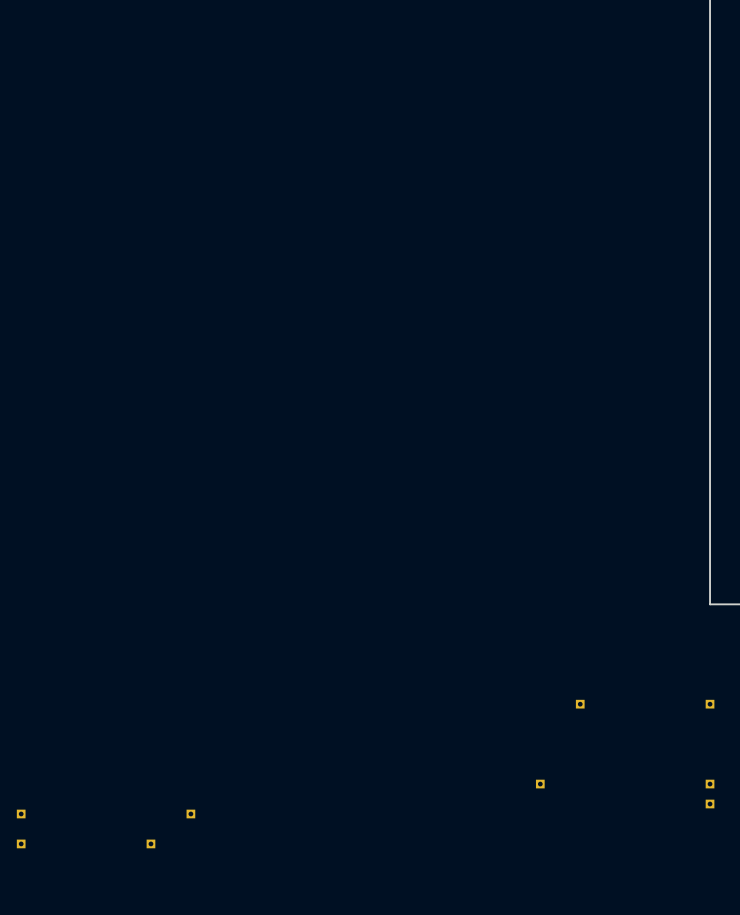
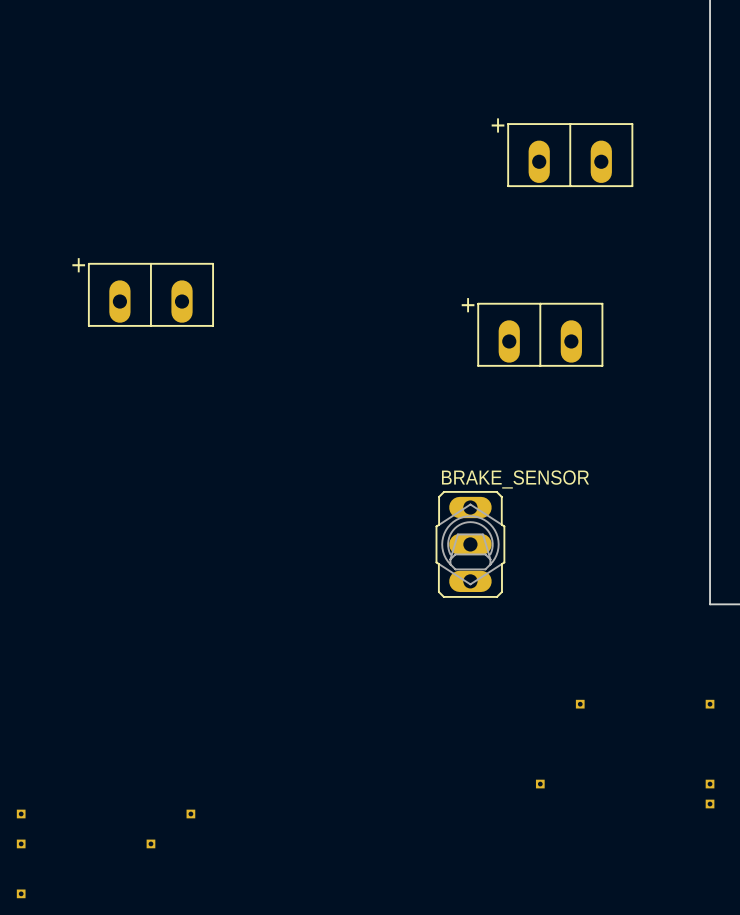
part: none -> (570, 155)
part: none -> (150, 294)
part: none -> (540, 334)
BRAKE_SENSOR: none -> (470, 544)
part: none -> (21, 893)

